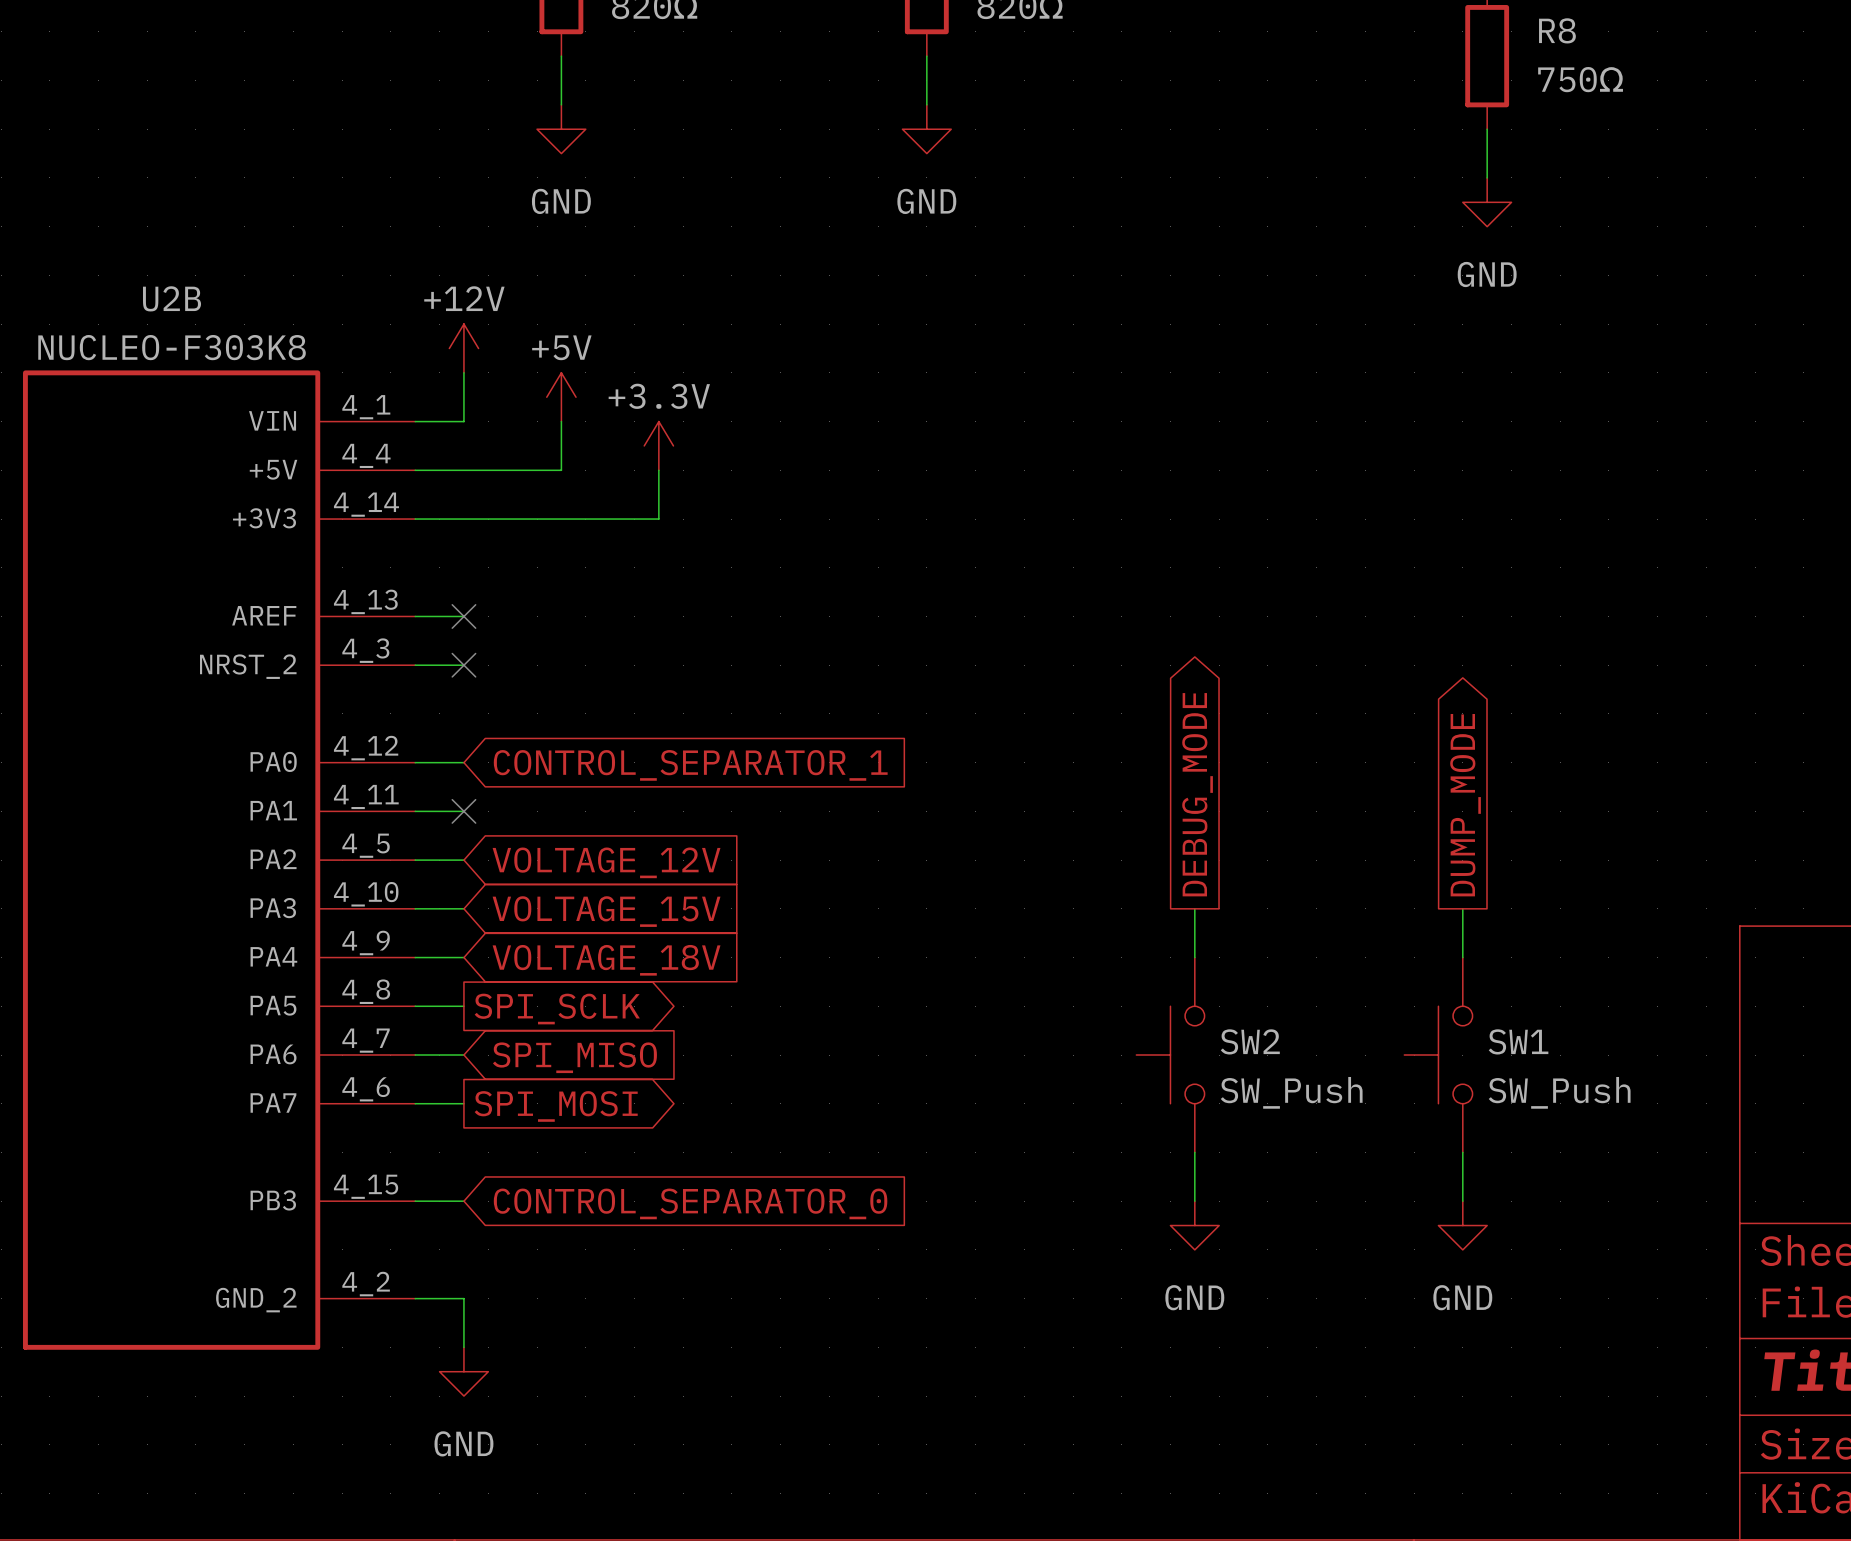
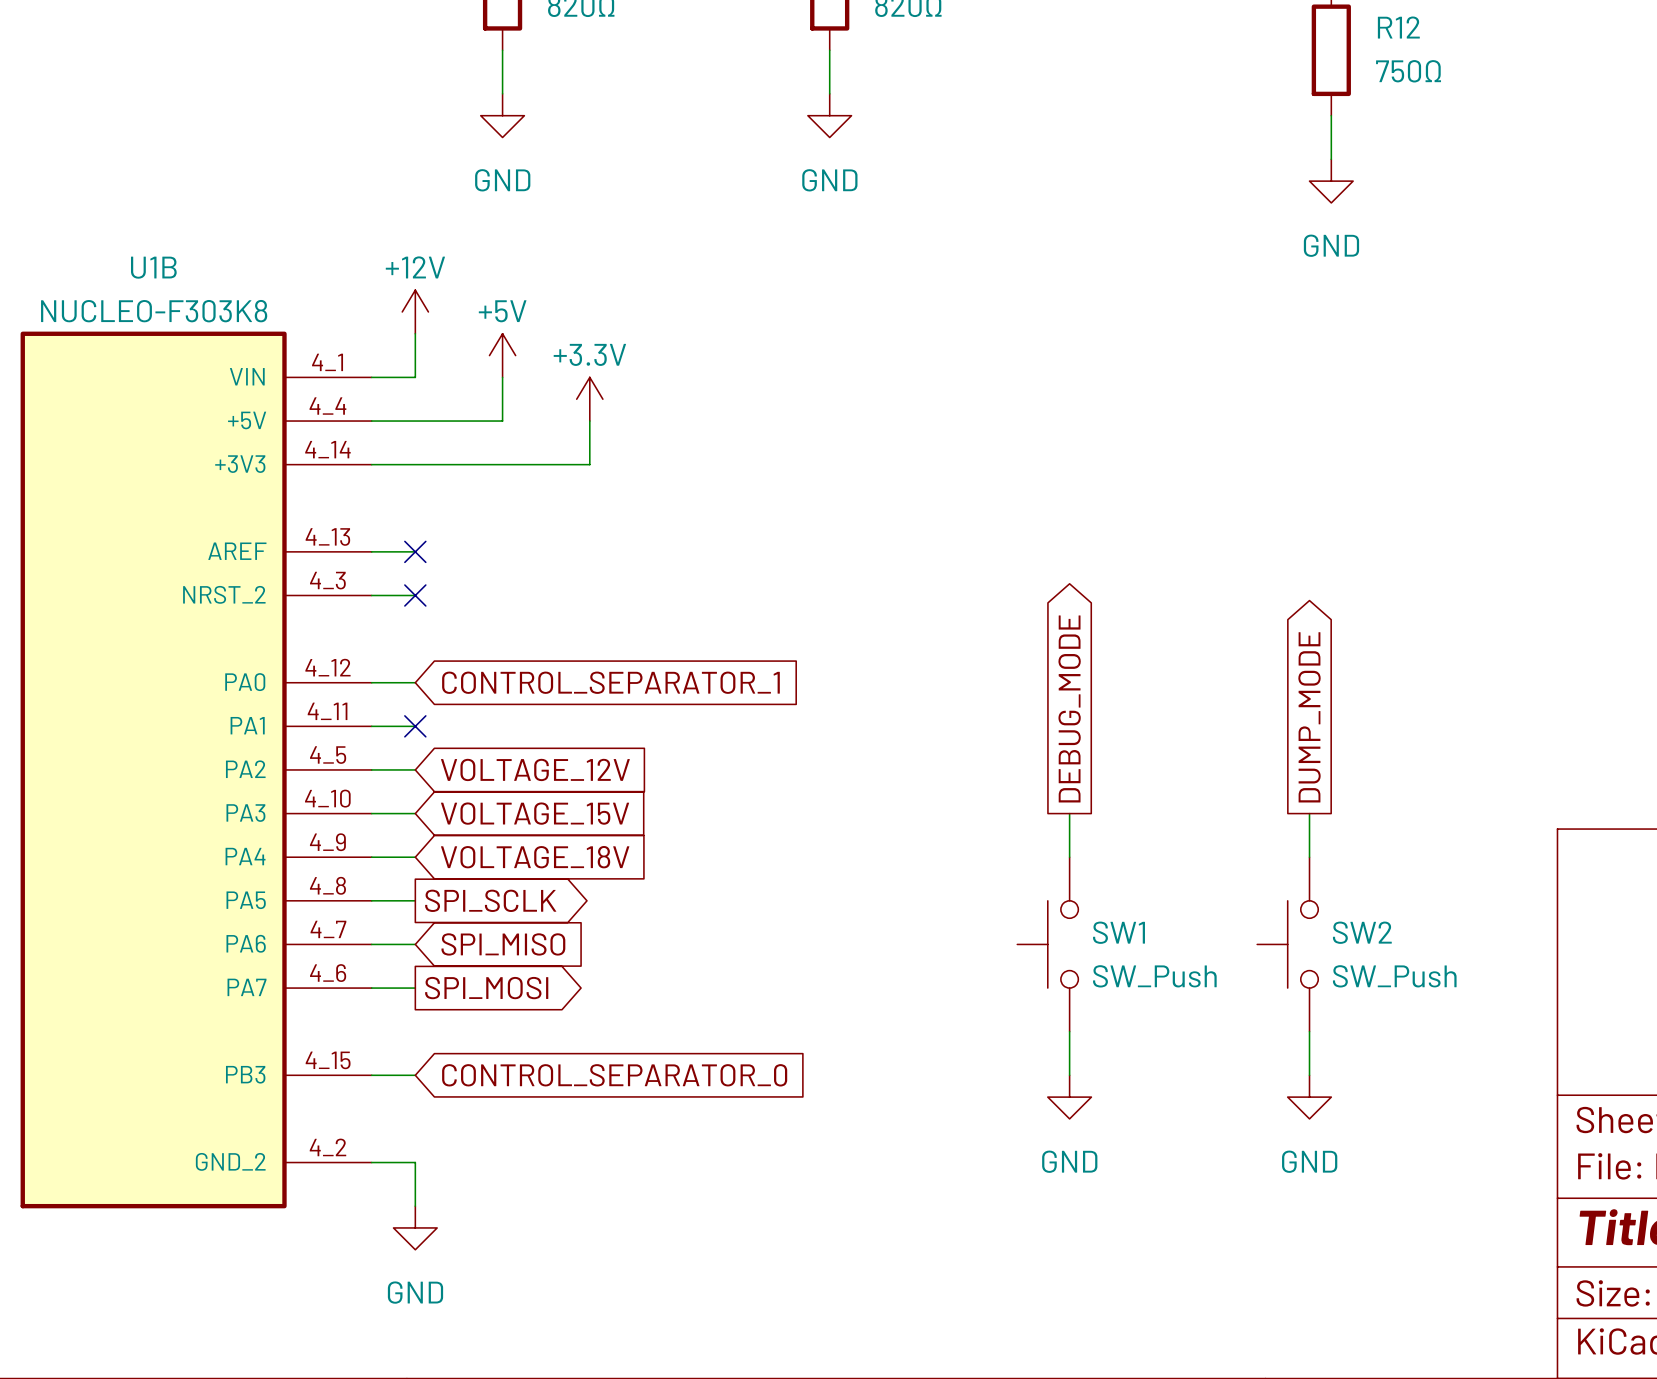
R8 name: R8 (1557, 30) -> R12 (1398, 27)
U2B name: U2B (172, 298) -> U1B (153, 267)
SW2 name: SW2 (1250, 1041) -> SW1 (1119, 932)
SW1 name: SW1 (1518, 1041) -> SW2 (1362, 932)

